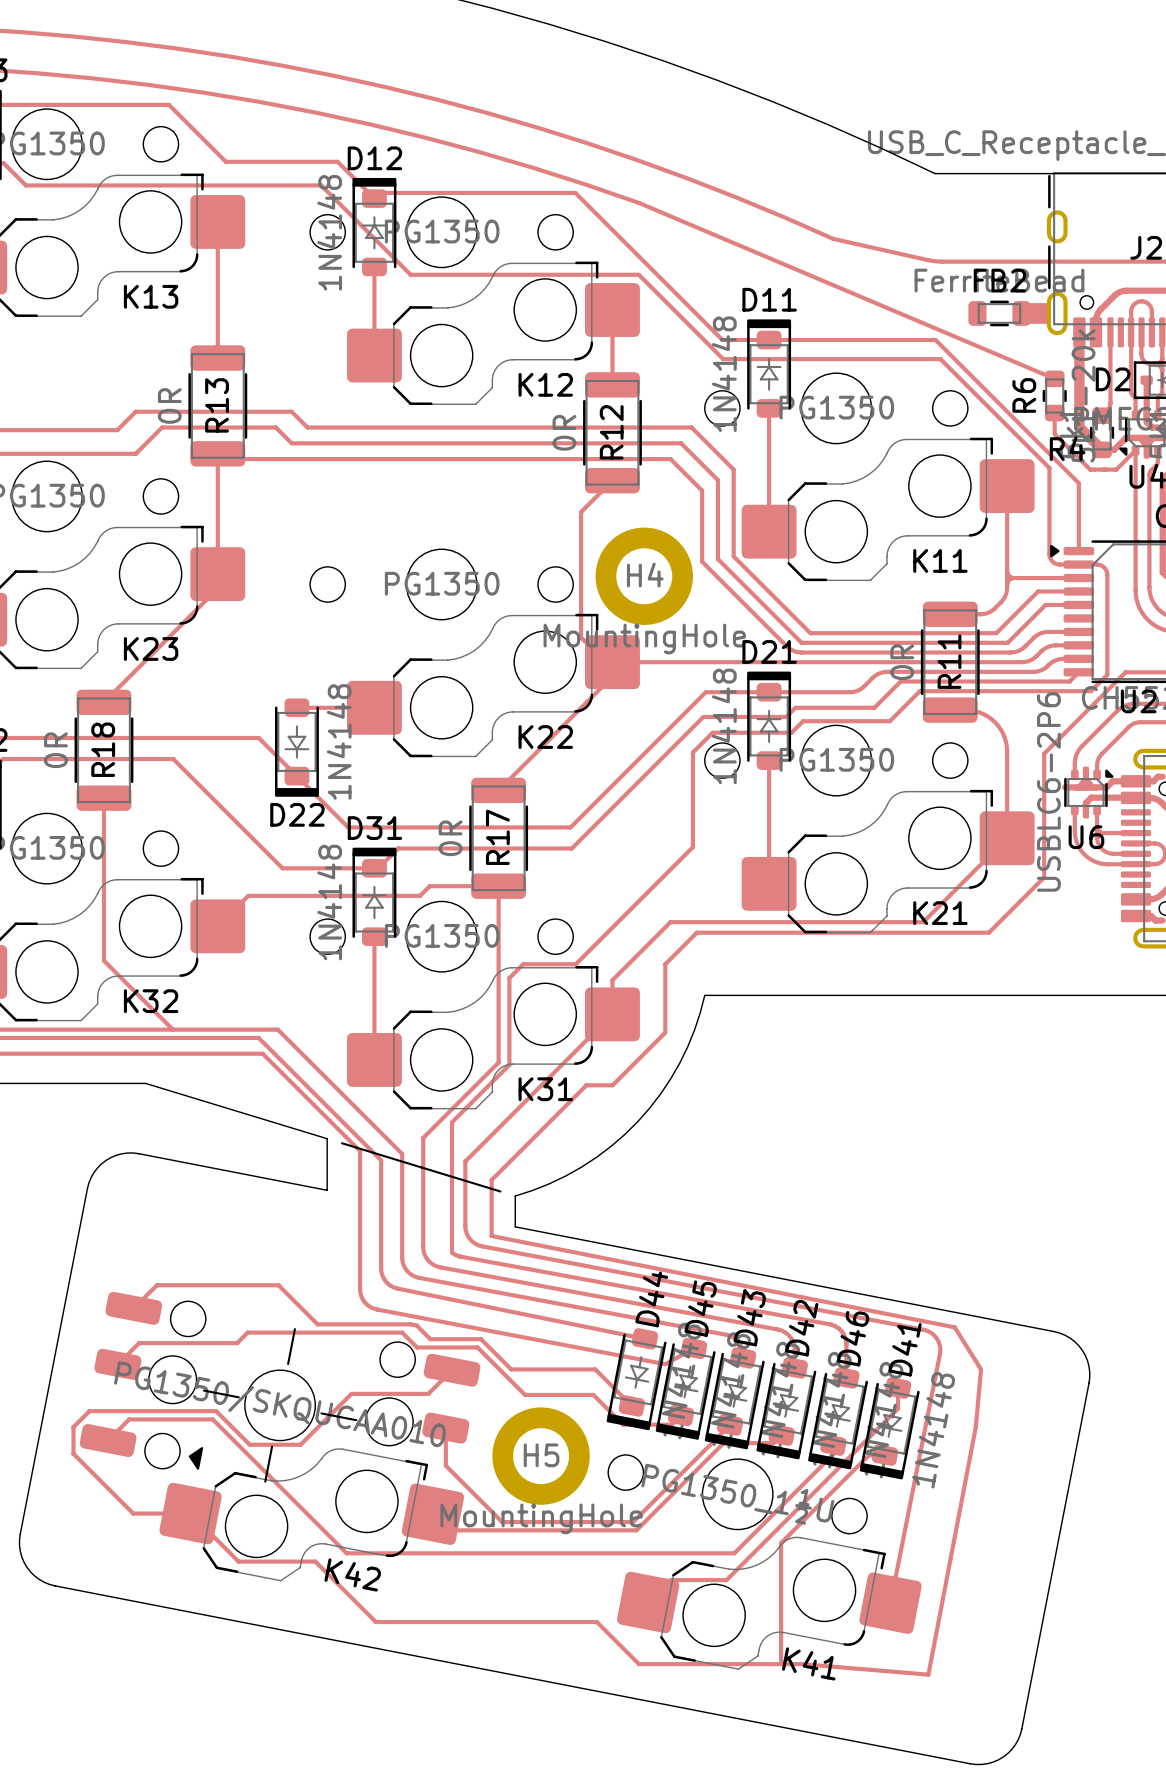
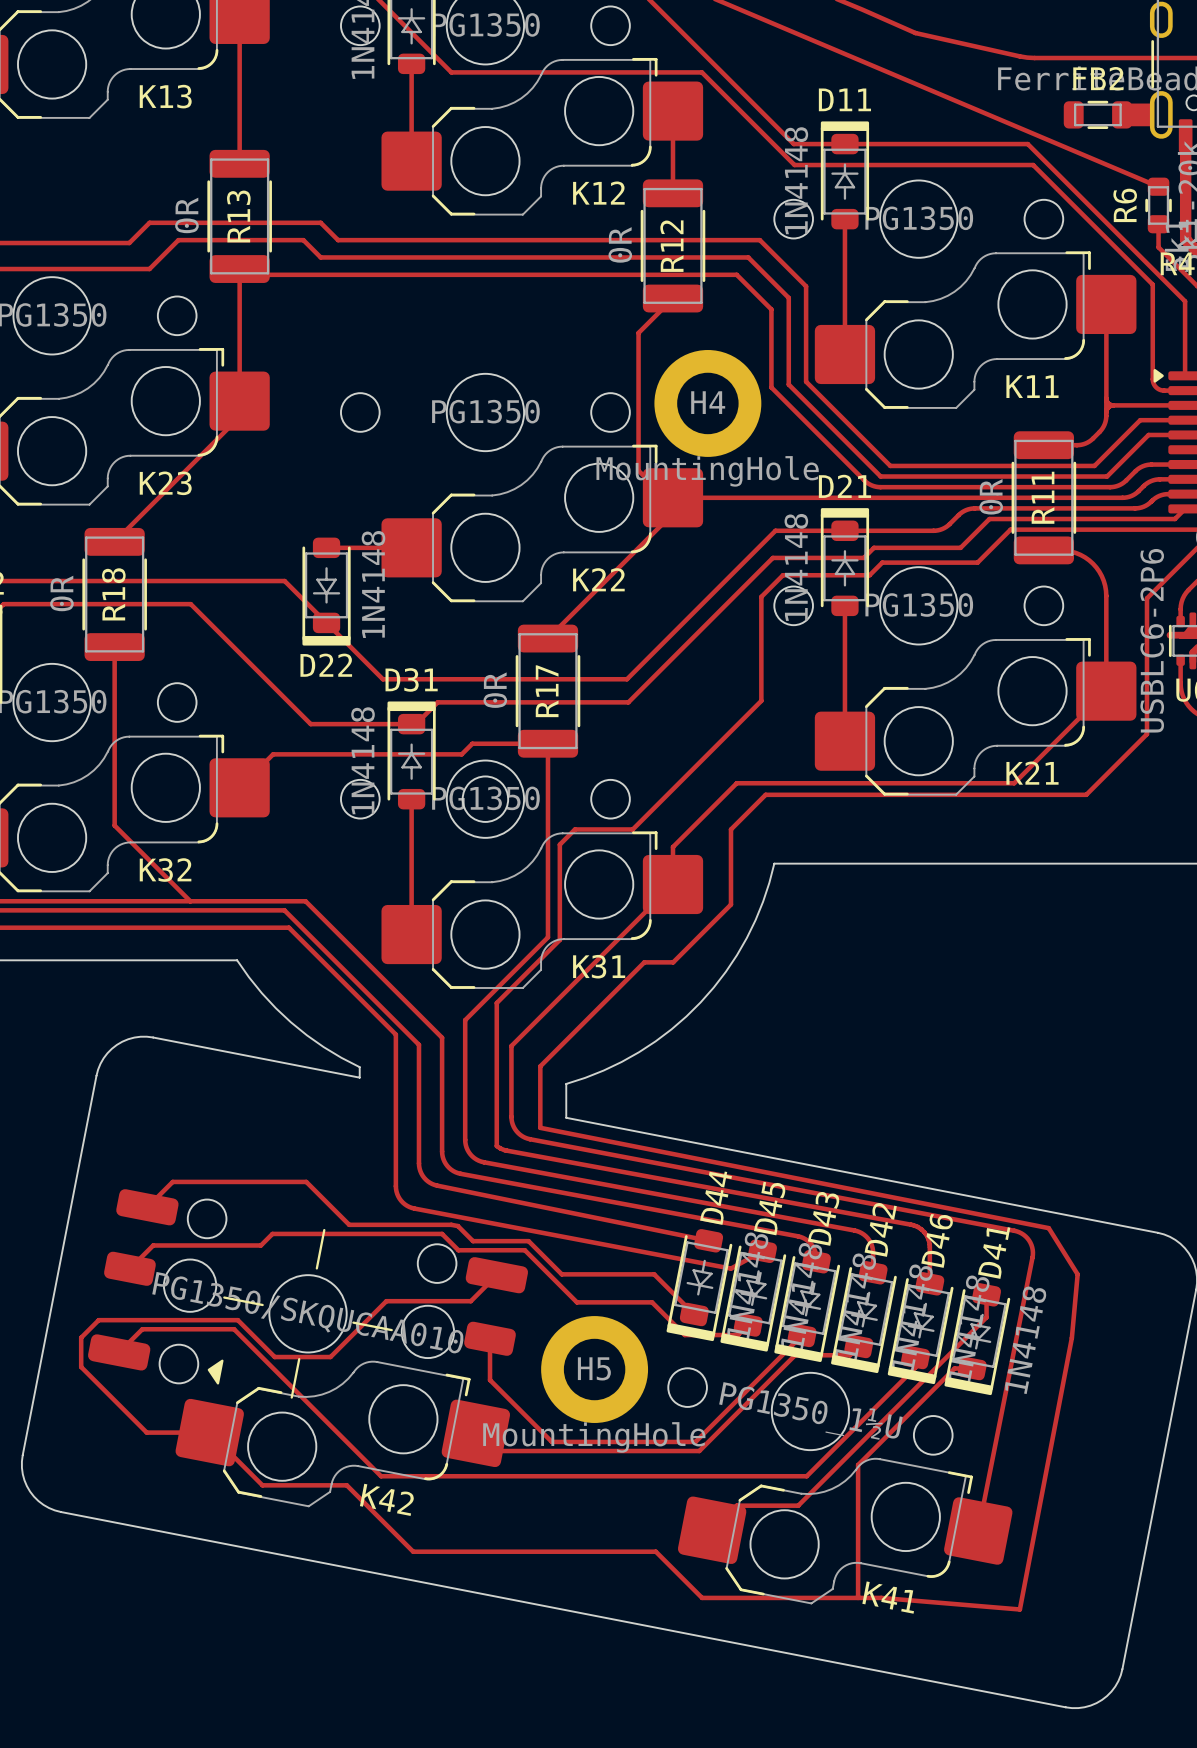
round board edge: none -> [462, 775, 509, 823]
board edge: (145, 1083) (327, 1138) (327, 1180) -> (160, 960) (237, 960) (261, 993) (290, 1022) (323, 1047) (359, 1067)
line: (341, 1143) (500, 1191) -> none

